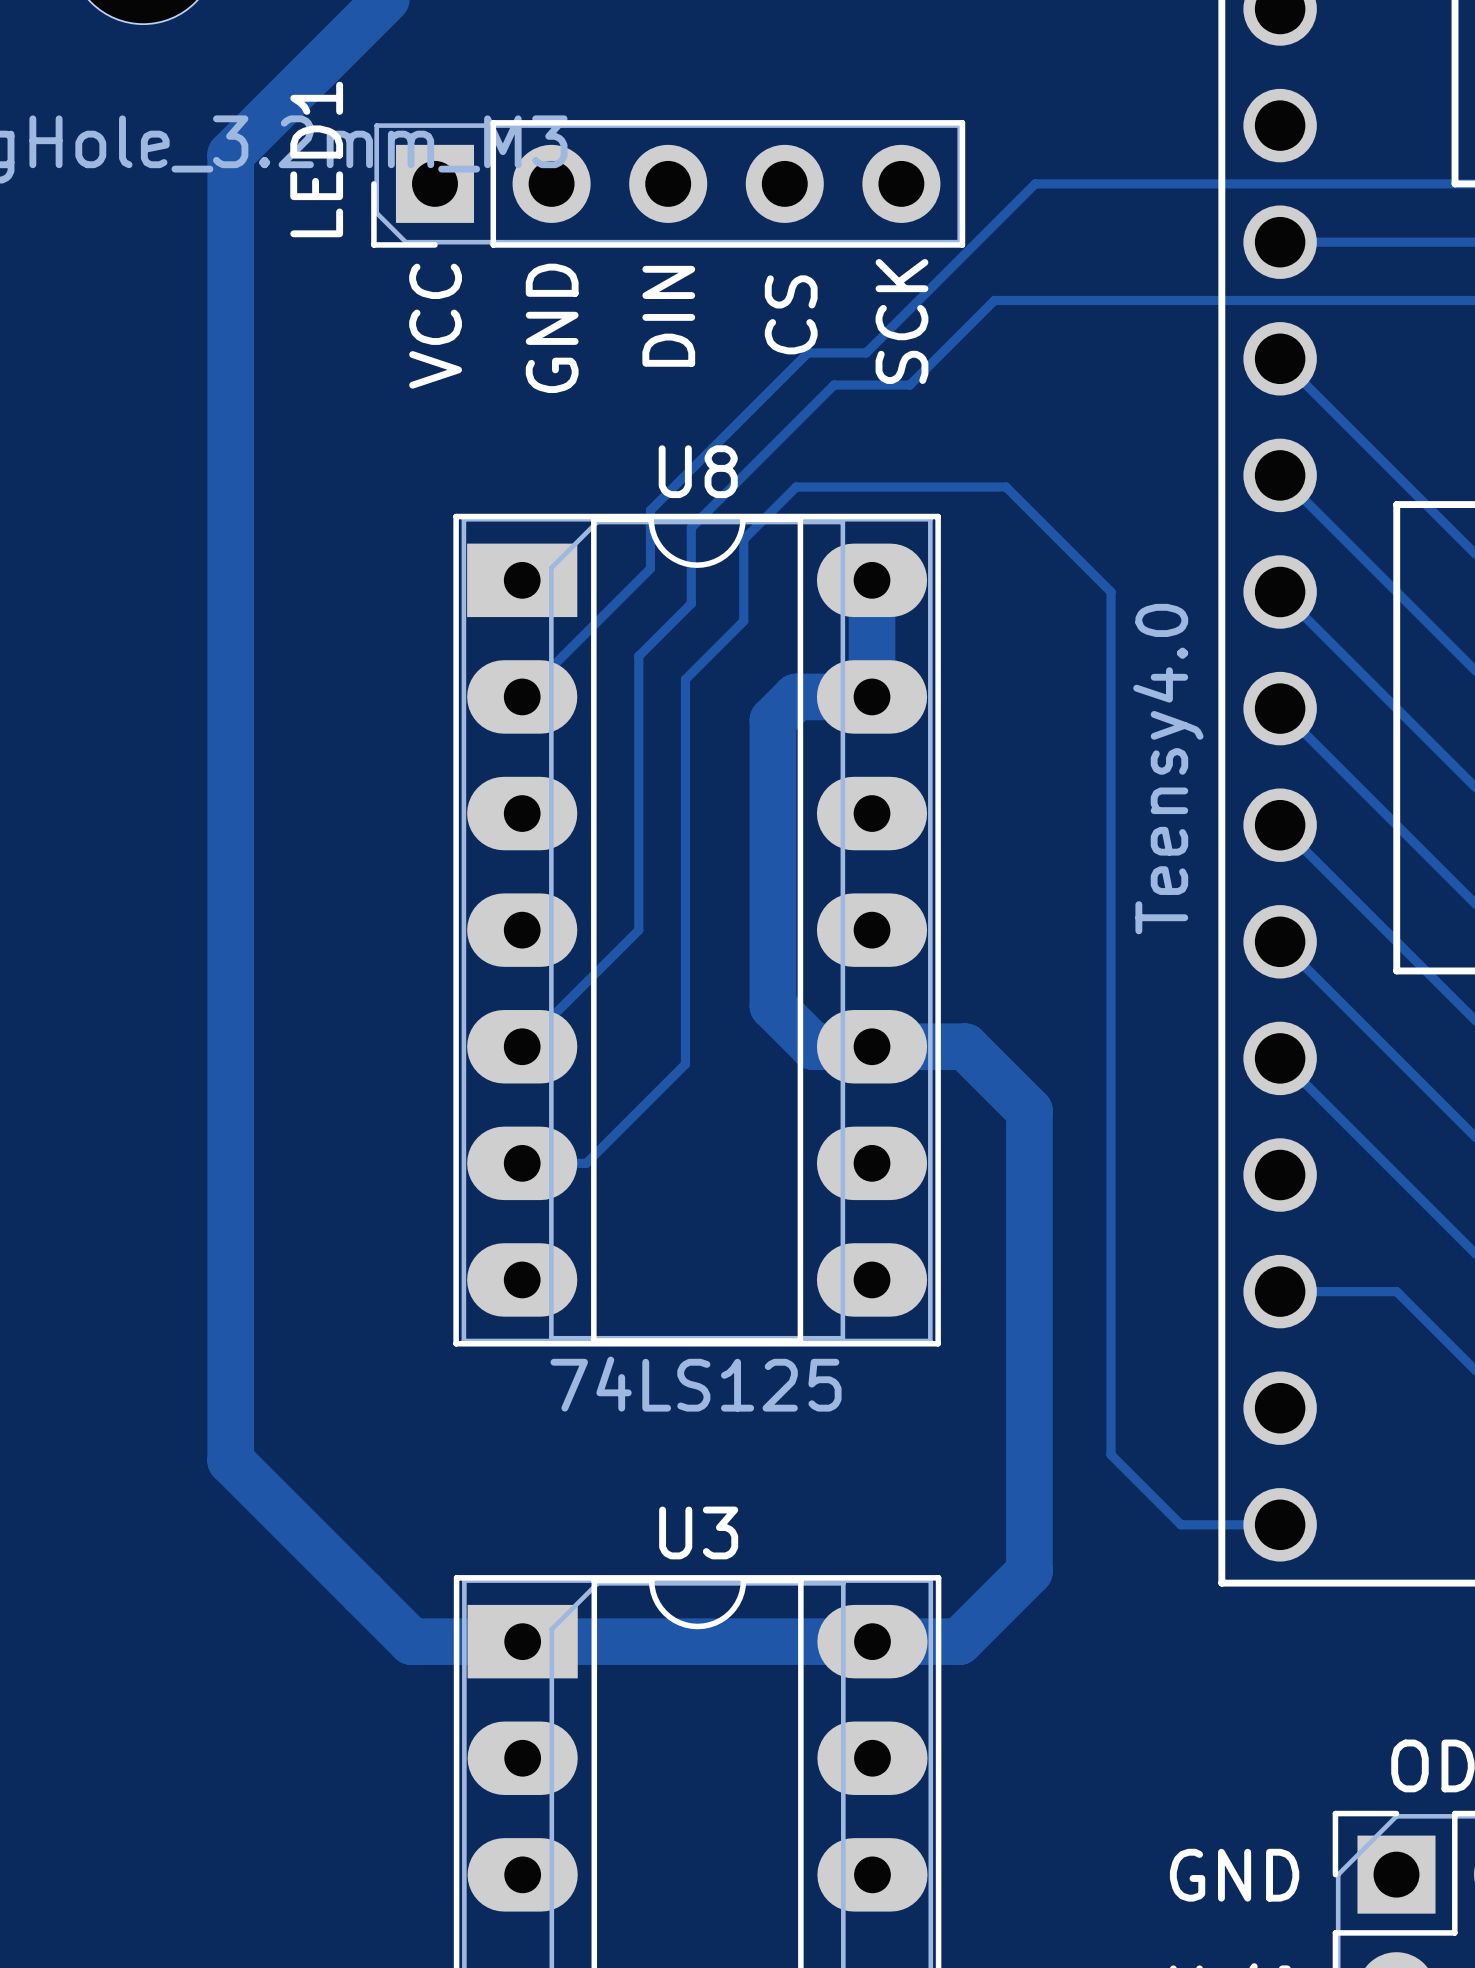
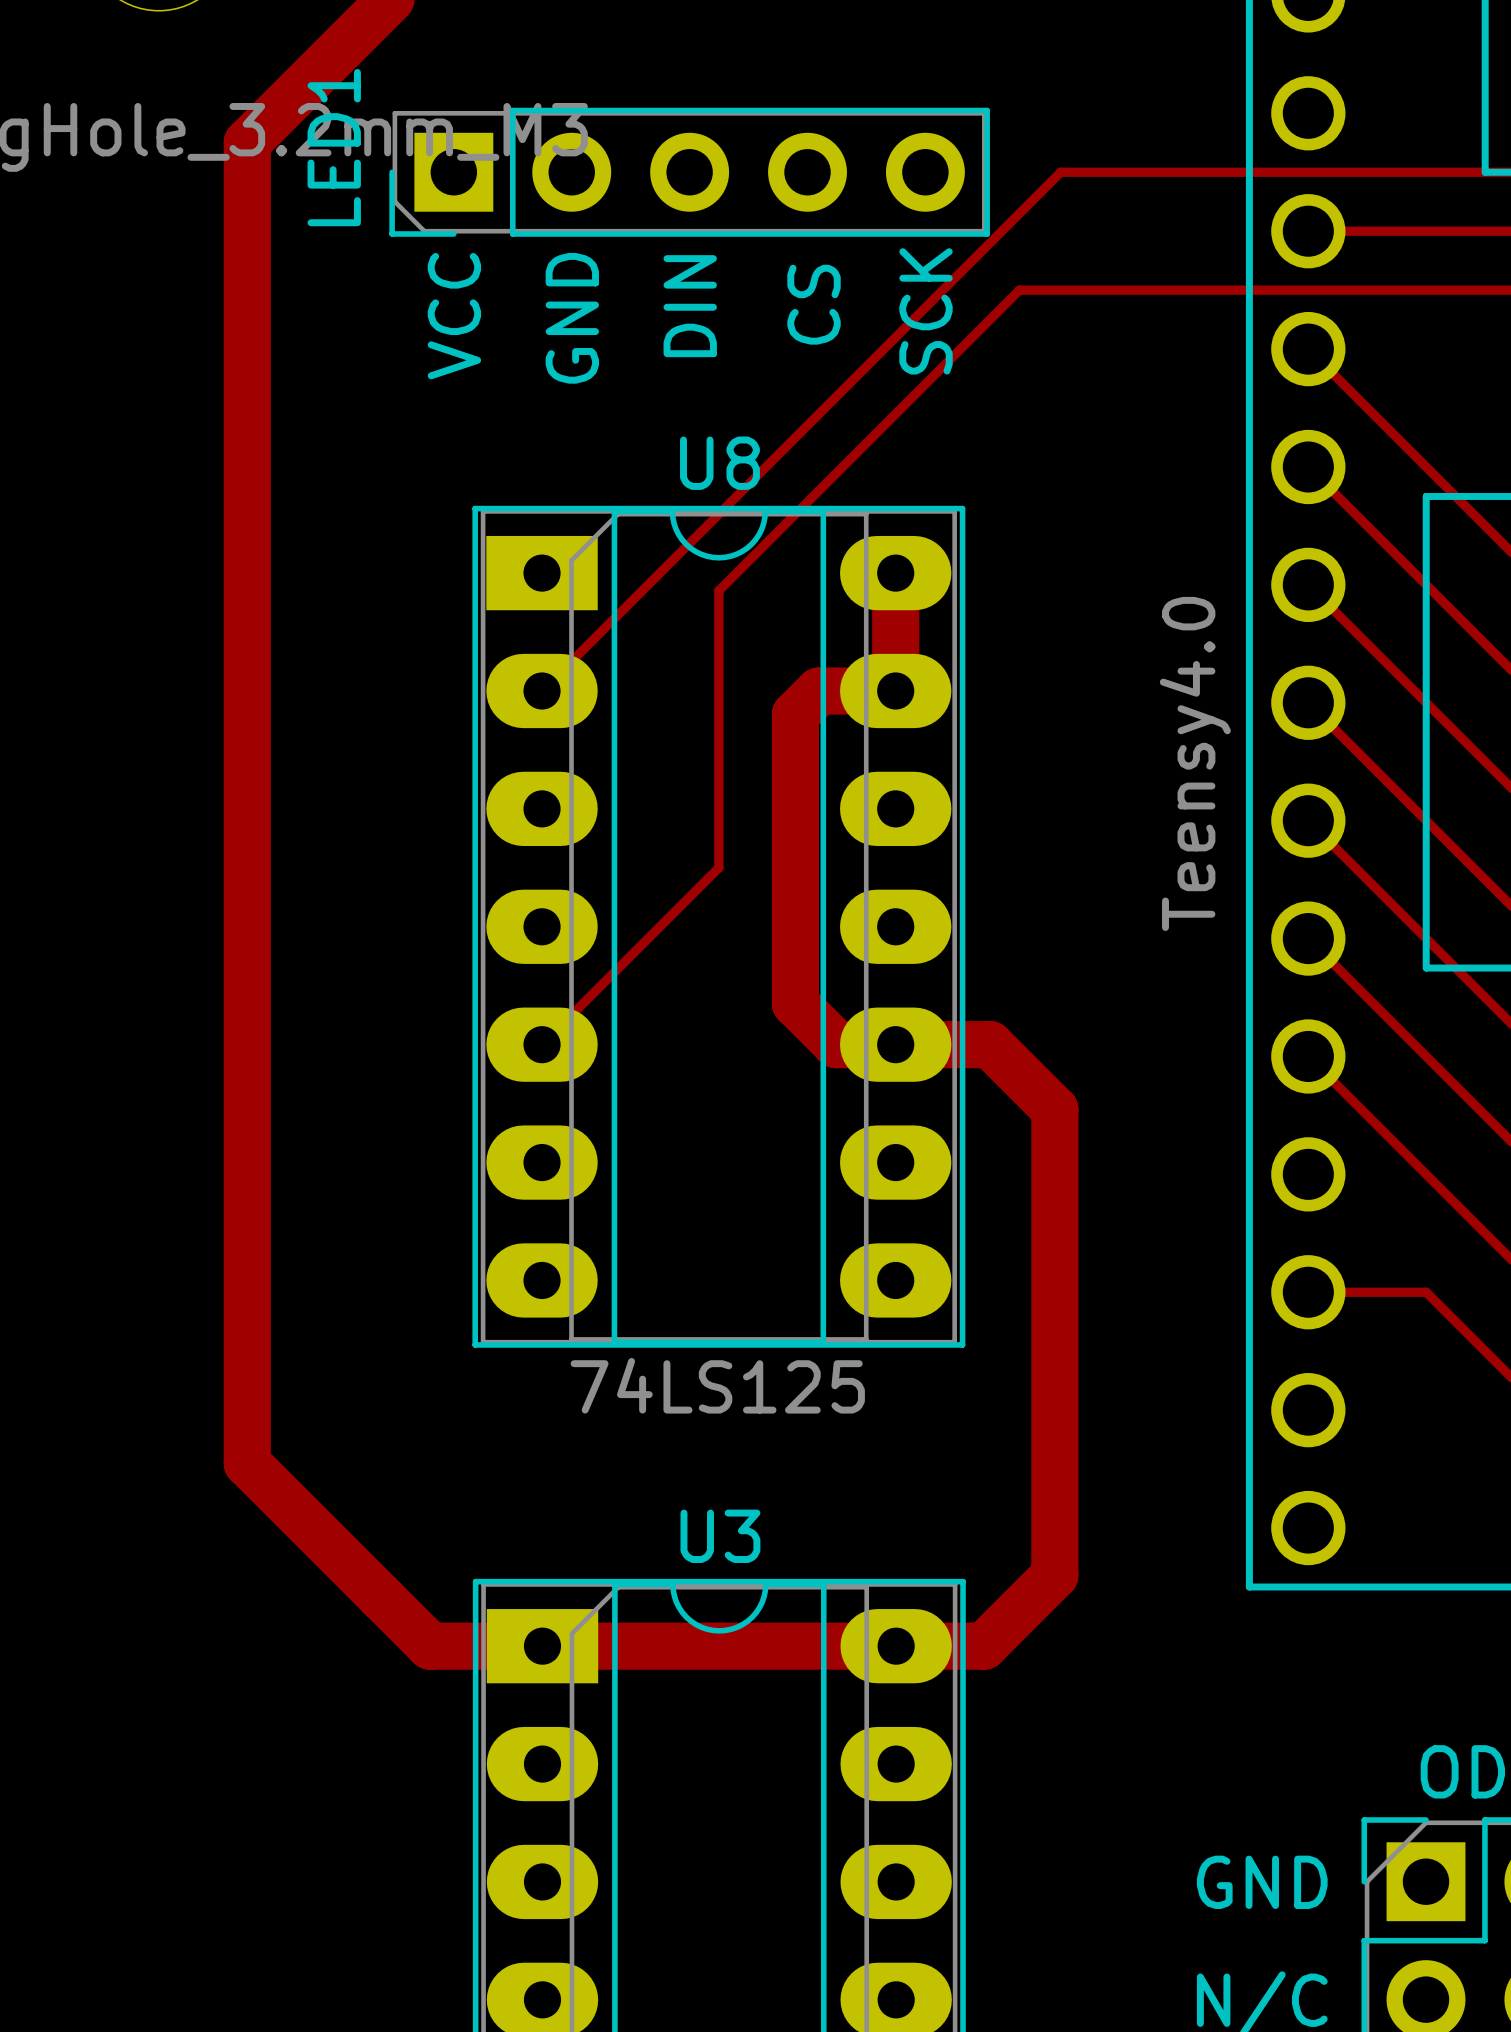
track: (866, 352) (807, 352) (650, 510) (650, 568) -> (712, 520) (671, 561)
track: (834, 385) (909, 385) -> (857, 375) (889, 343)
track: (691, 527) (691, 603) (638, 656) (638, 930) -> (934, 375) (718, 590) (718, 867) (659, 926)
track: (522, 1163) (586, 1163) (685, 1064) (685, 679) (743, 621) (743, 539) (796, 487) (1006, 487) (1111, 592) (1111, 1454) (1181, 1524) (1280, 1524) -> none

